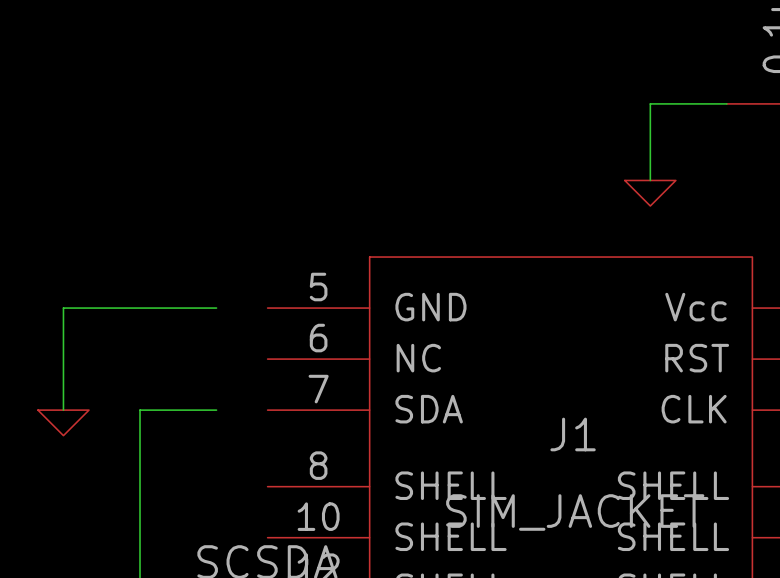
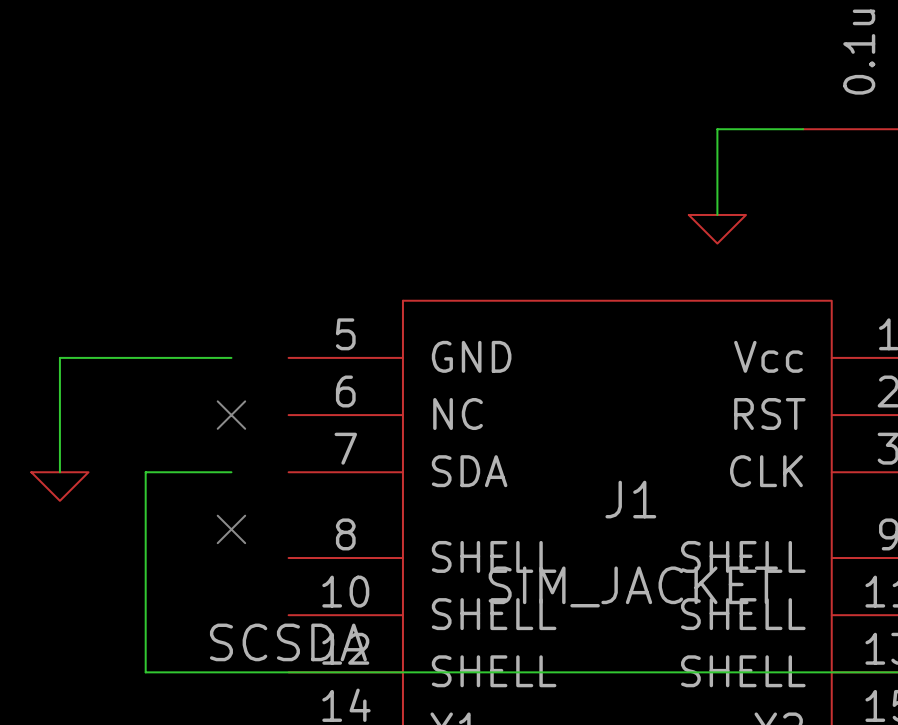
no-connect mark: none -> (231, 415)
no-connect mark: none -> (231, 529)

